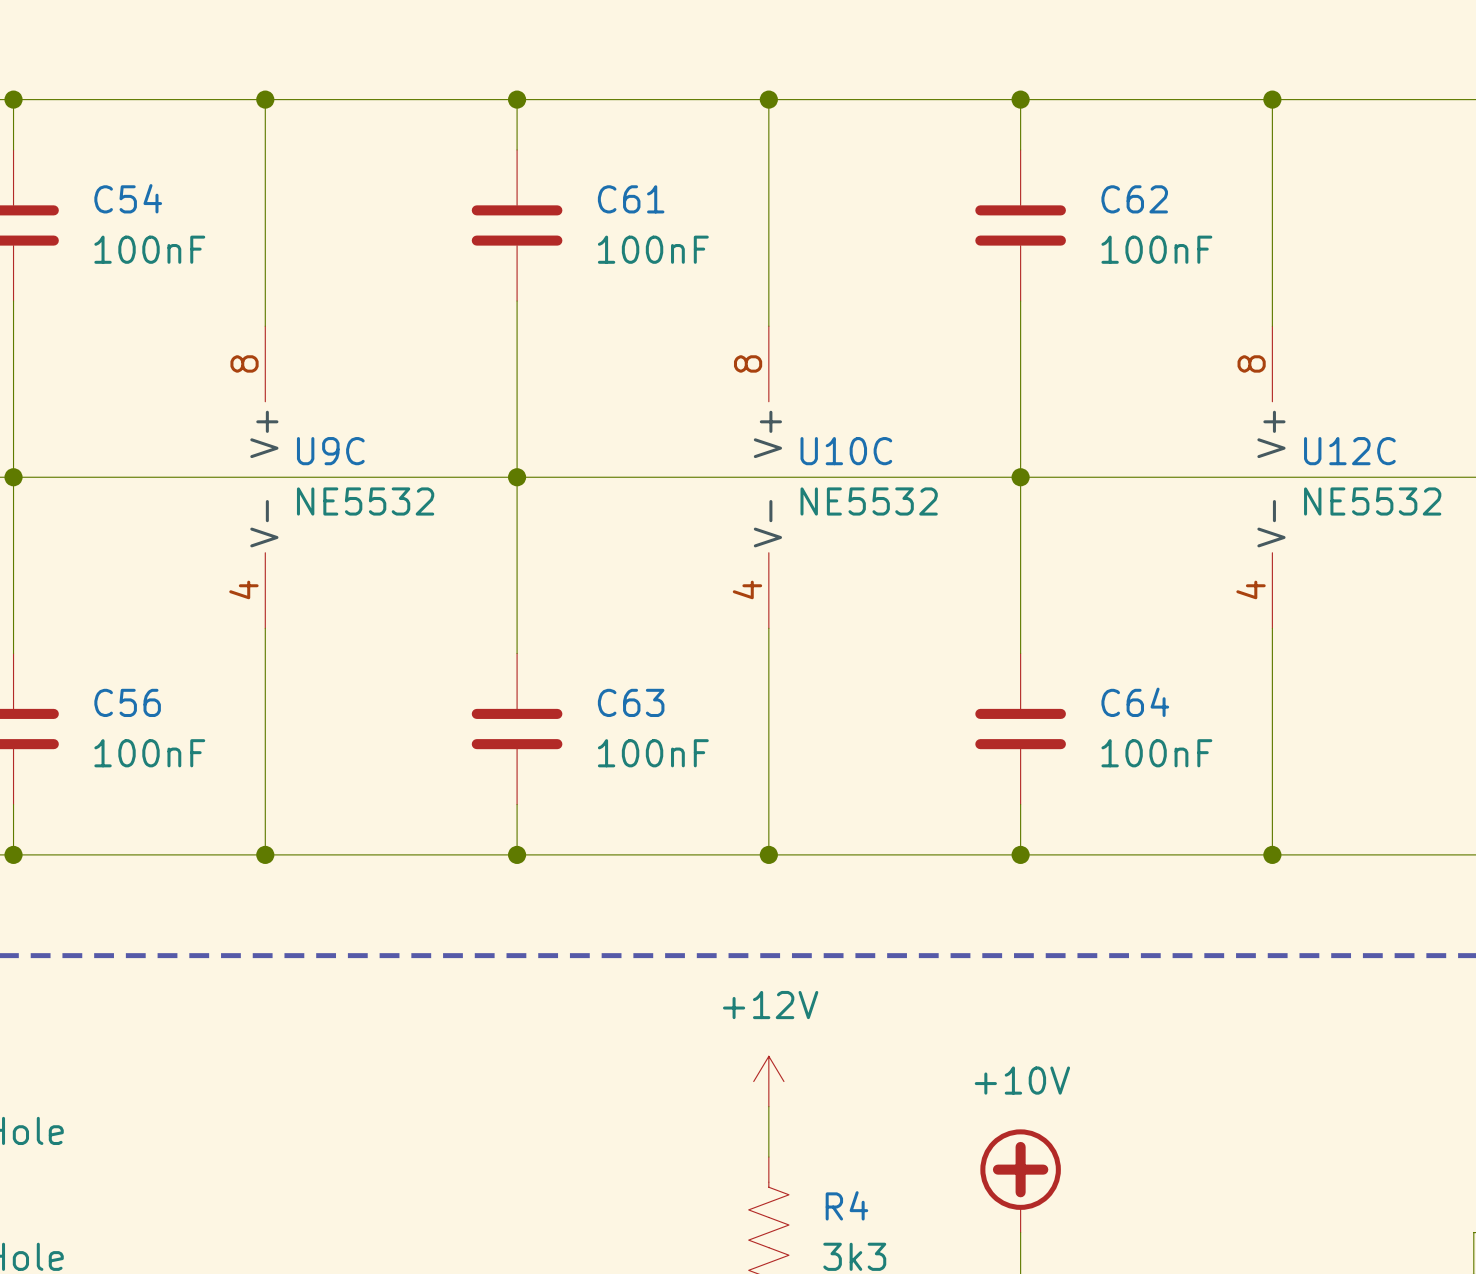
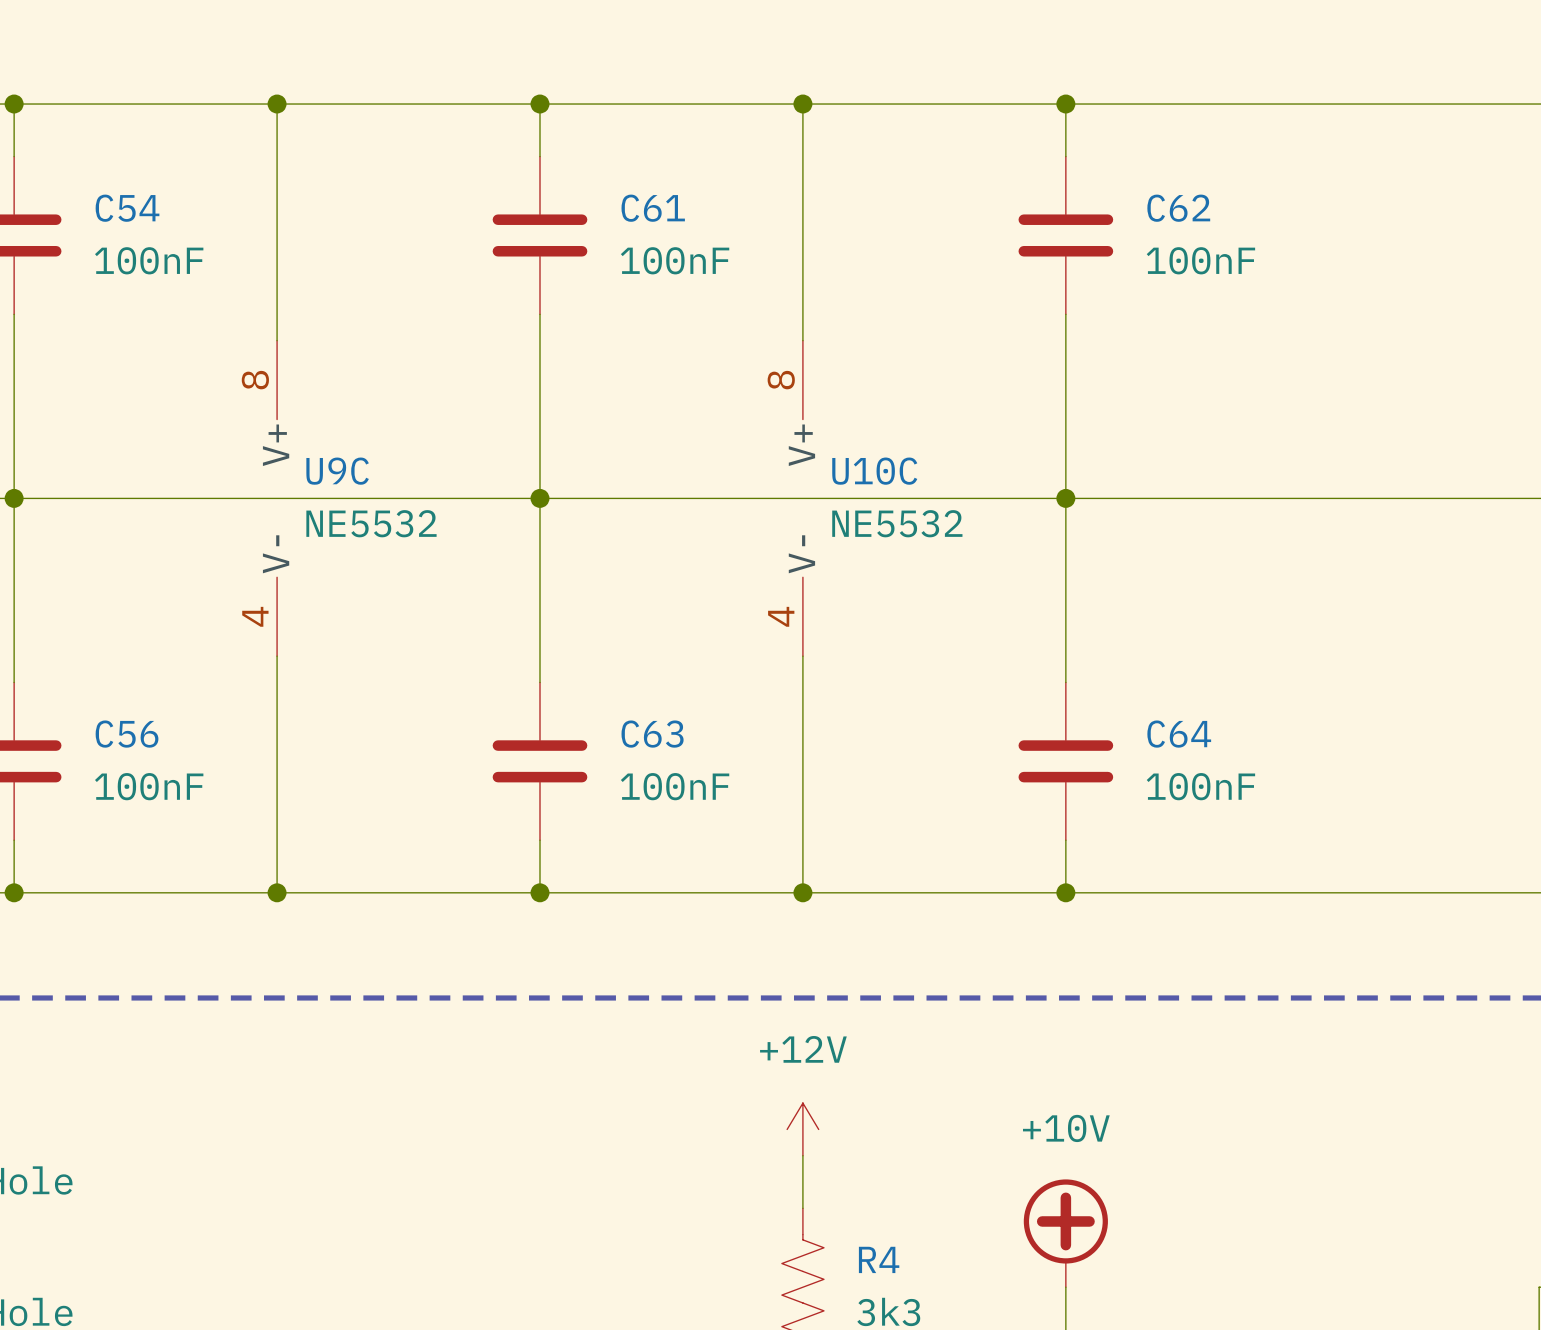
wire: (1272, 99) (1272, 326) -> none
junction: (1272, 99) -> none
U12C: NE5532 (1272, 477) -> none
wire: (1272, 628) (1272, 854) -> none
junction: (1272, 854) -> none

